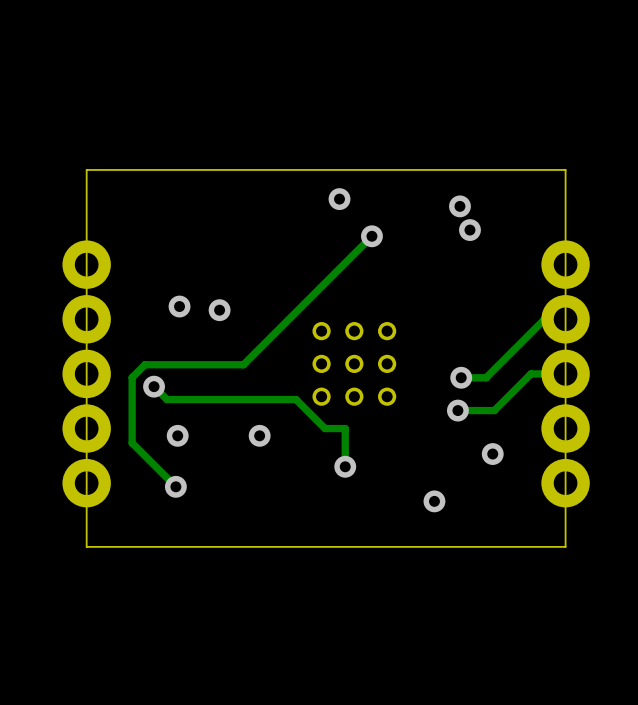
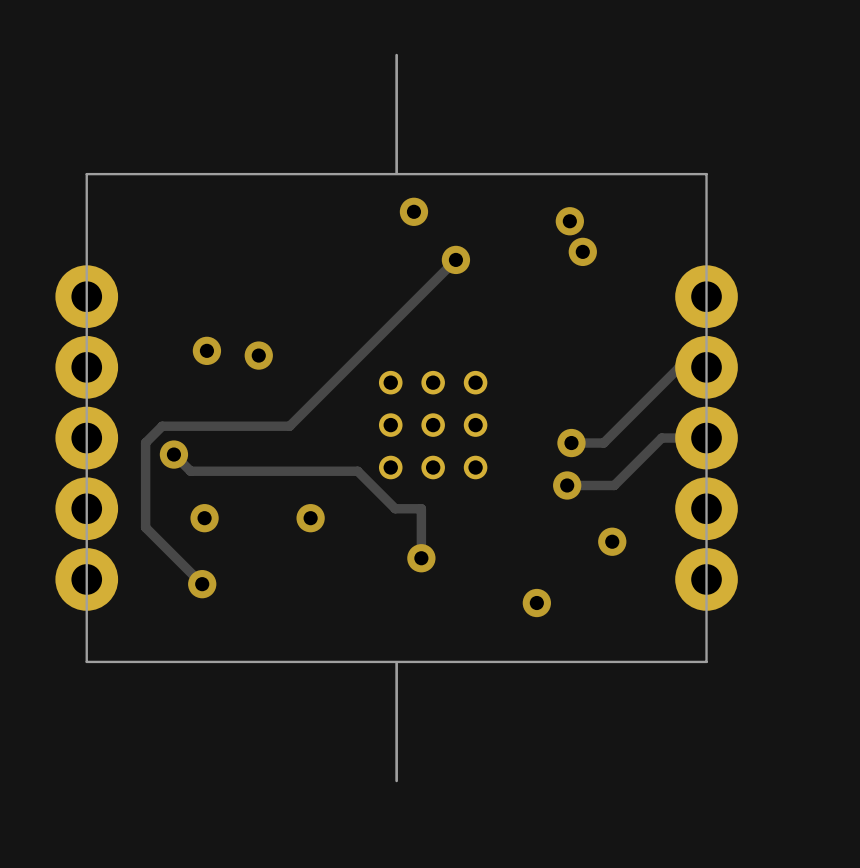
board edge: none -> (396, 55) (396, 172)
board edge: none -> (396, 663) (396, 780)

